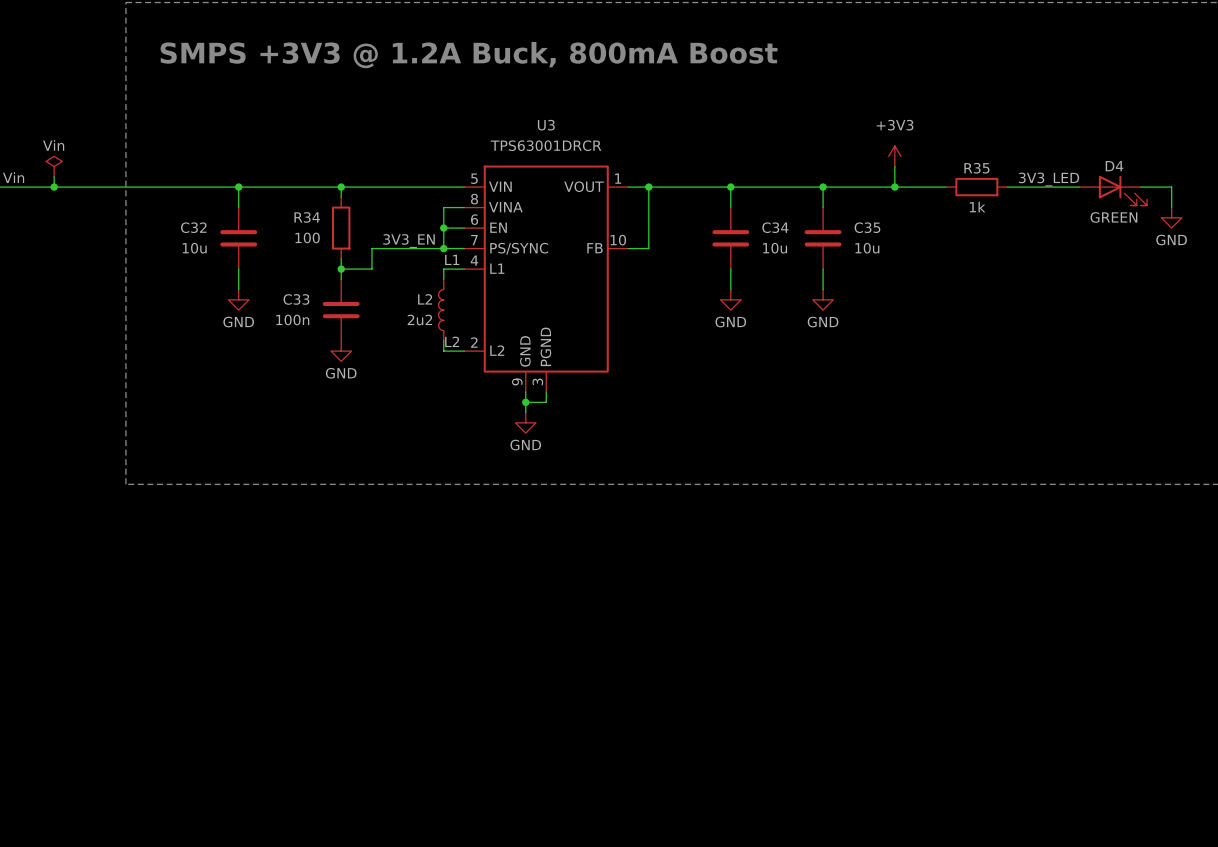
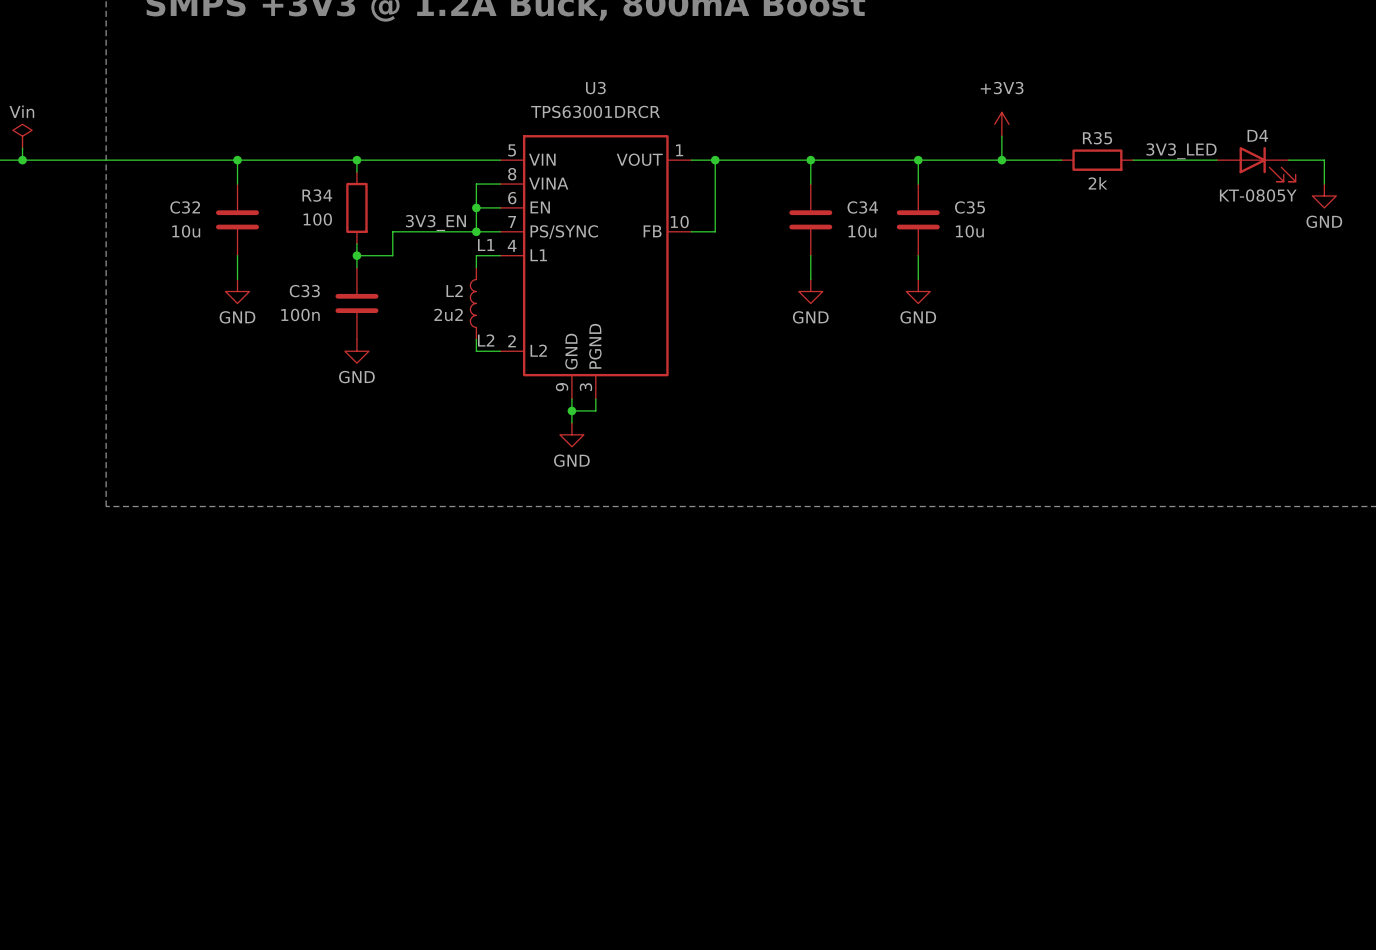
R35 value: 1k (977, 206) -> 2k (1098, 183)
D4 value: GREEN (1113, 217) -> KT-0805Y (1258, 195)

